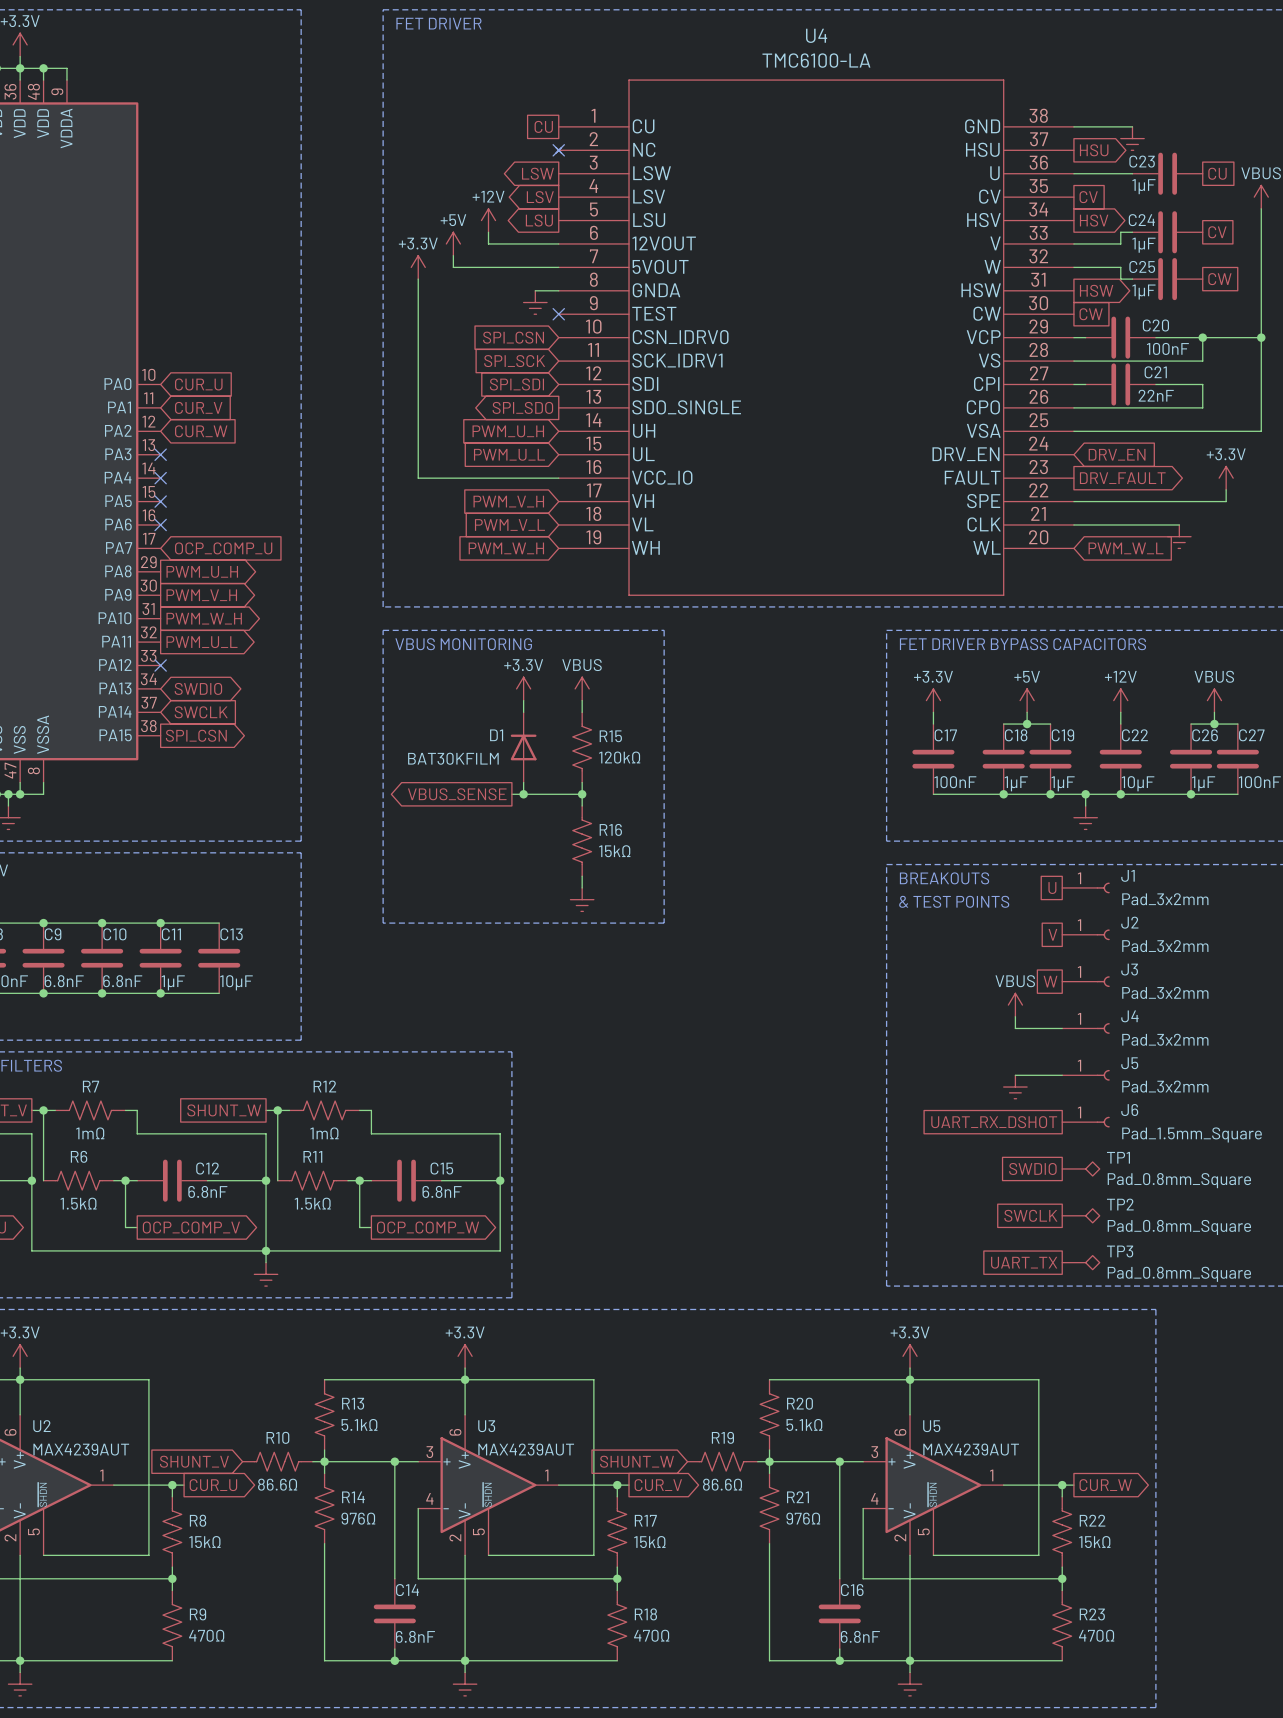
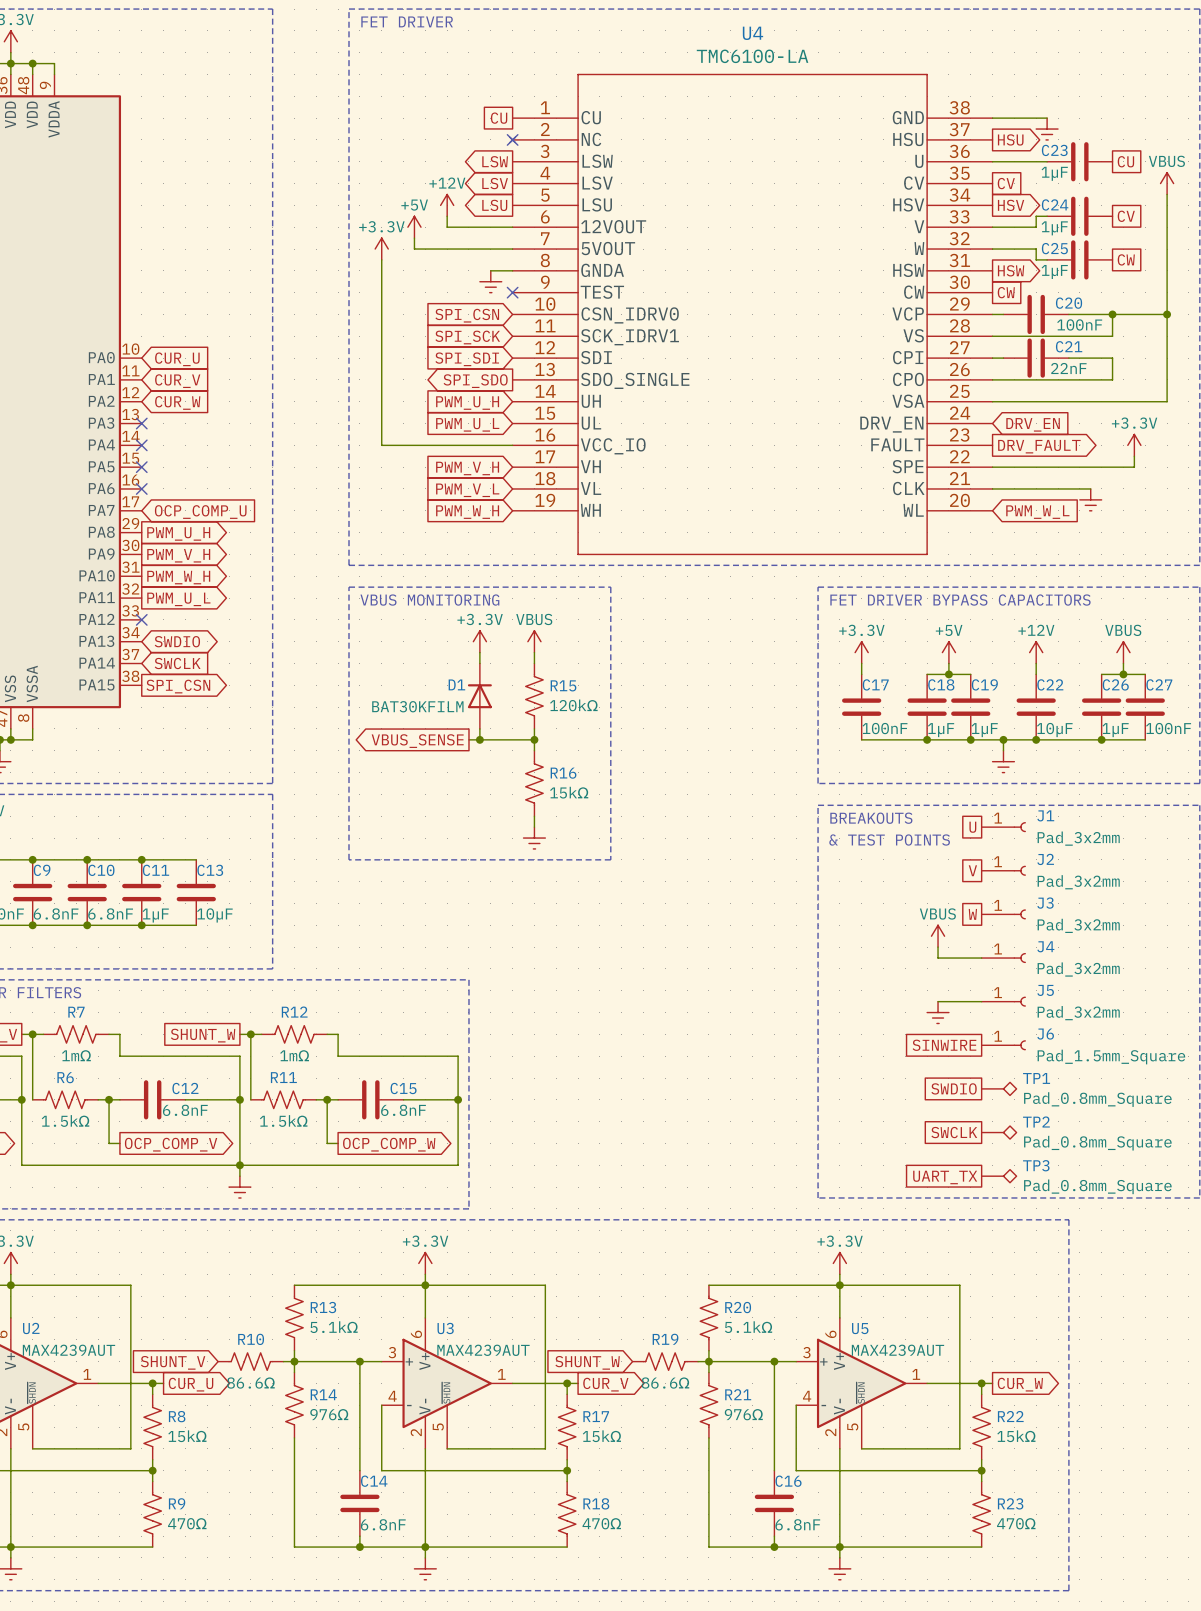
global label: UART_RX_DSHOT (994, 1122) -> SINWIRE (944, 1045)

